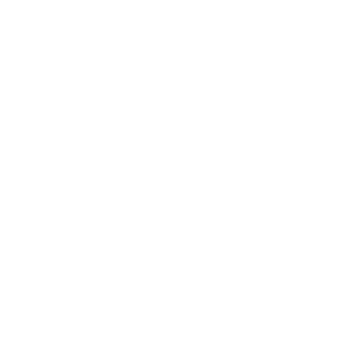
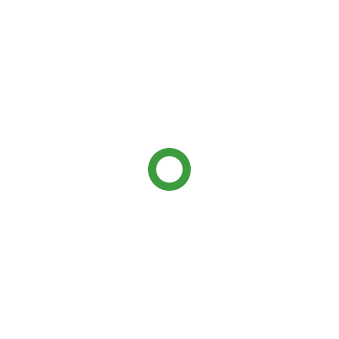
part: none -> (169, 169)

